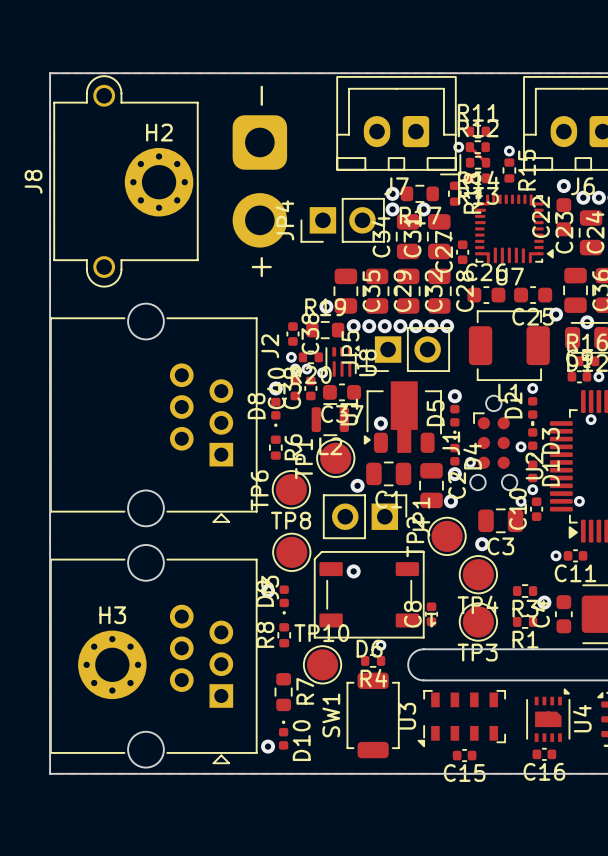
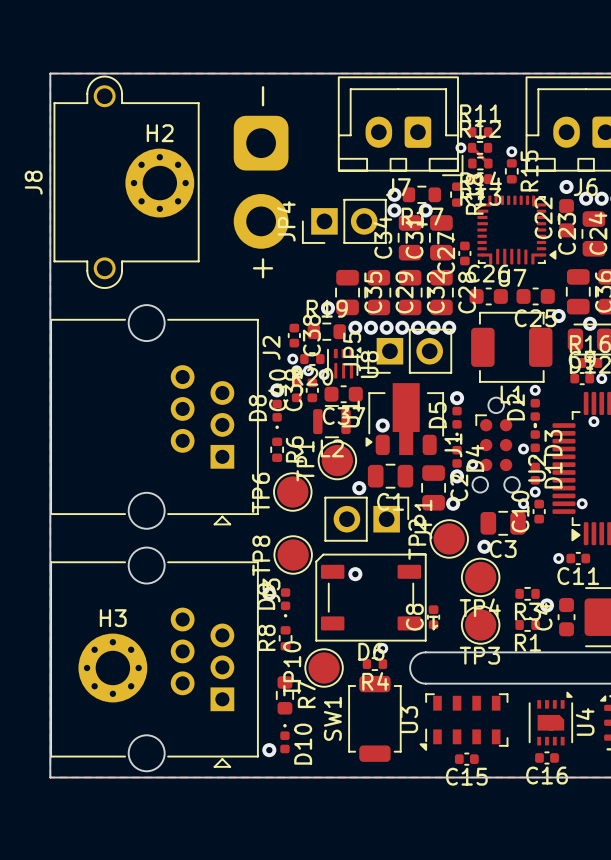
TP8 name rotation: 0° (291, 520) -> 90° counterclockwise (261, 555)
TP10 name rotation: 0° (321, 633) -> 90° counterclockwise (292, 668)

